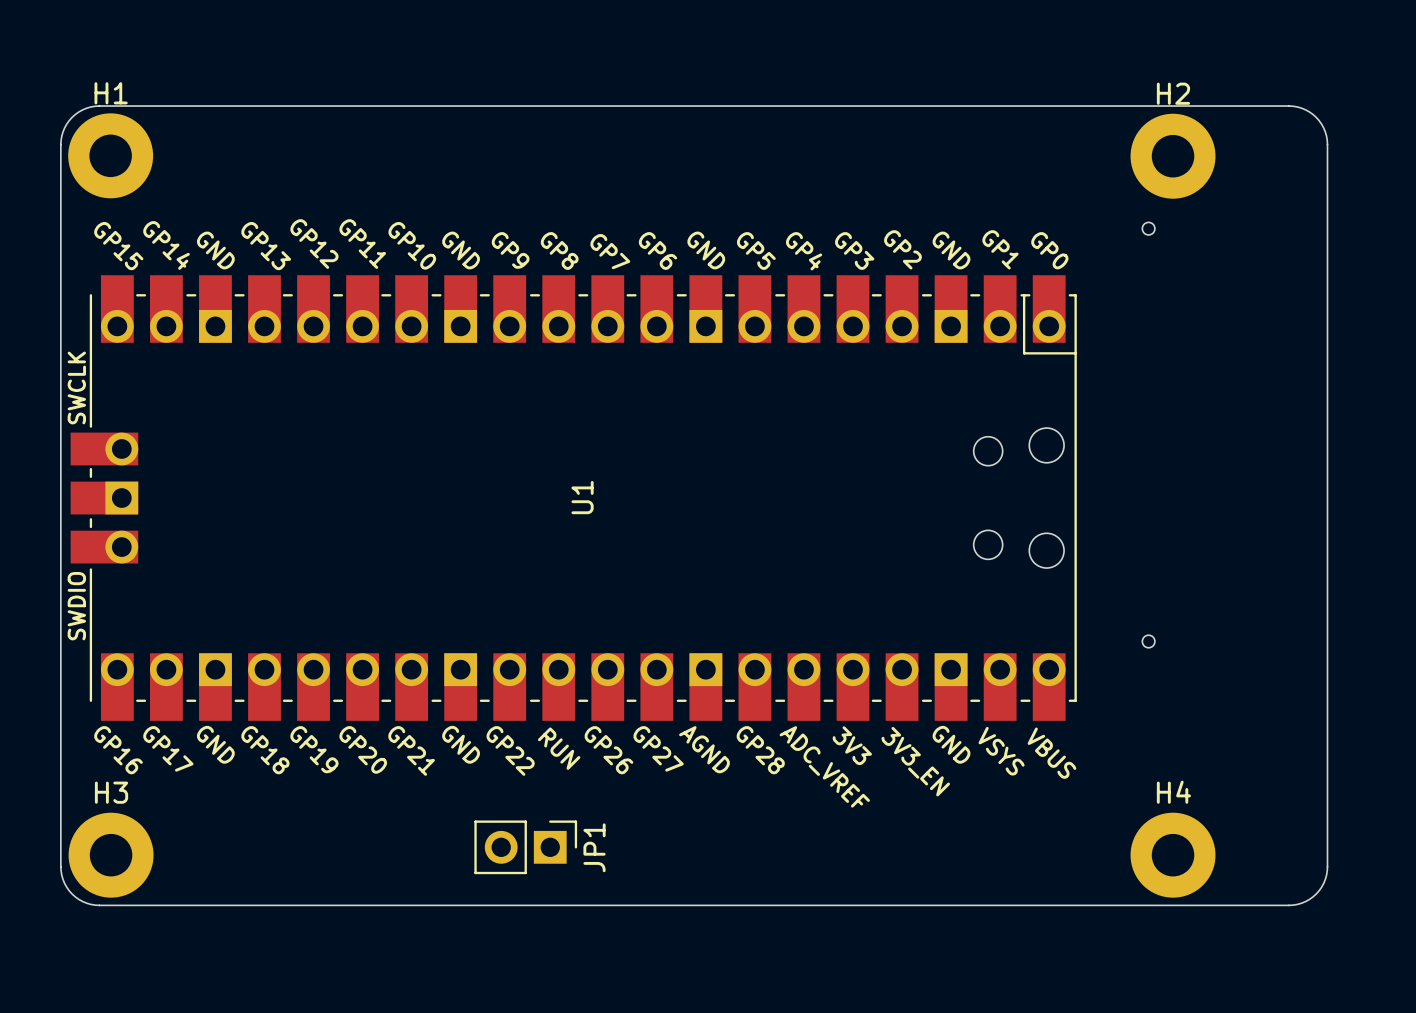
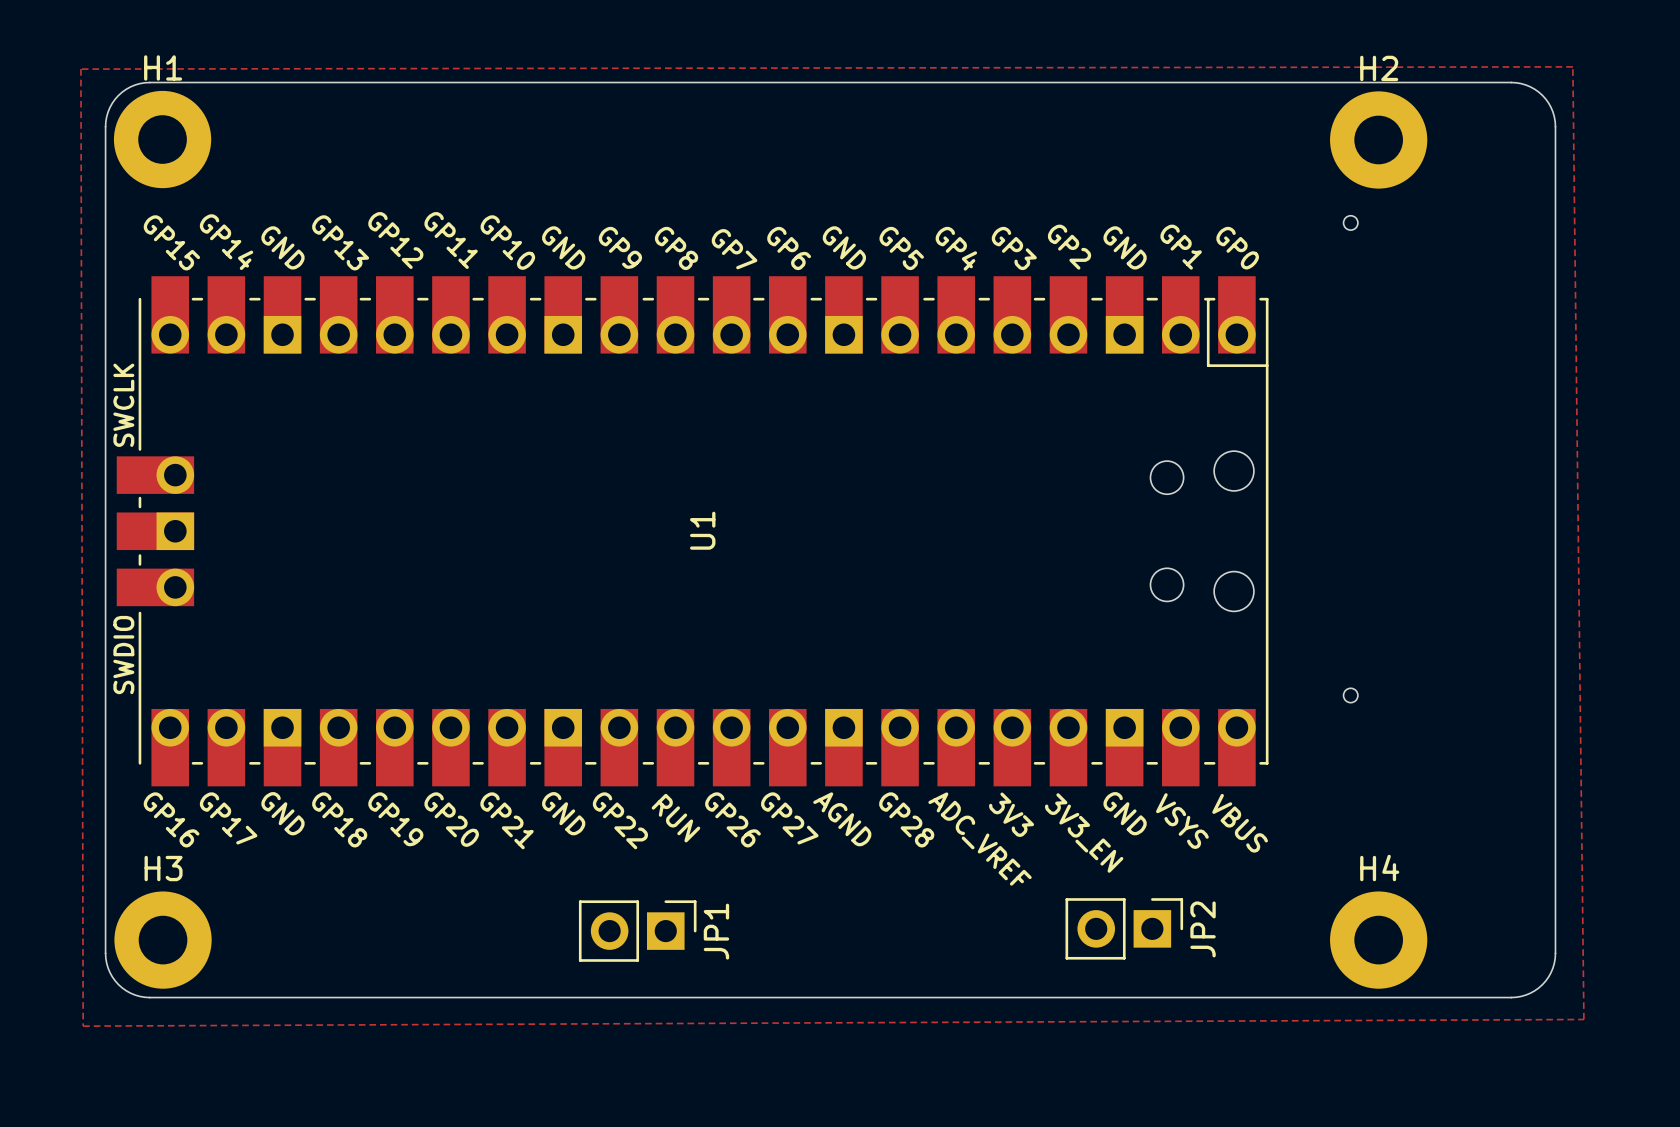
zone outline: none -> (1572, 66) (80, 69) (83, 1026) (1583, 1019) (1572, 66)
JP2: none -> (1124, 928)

